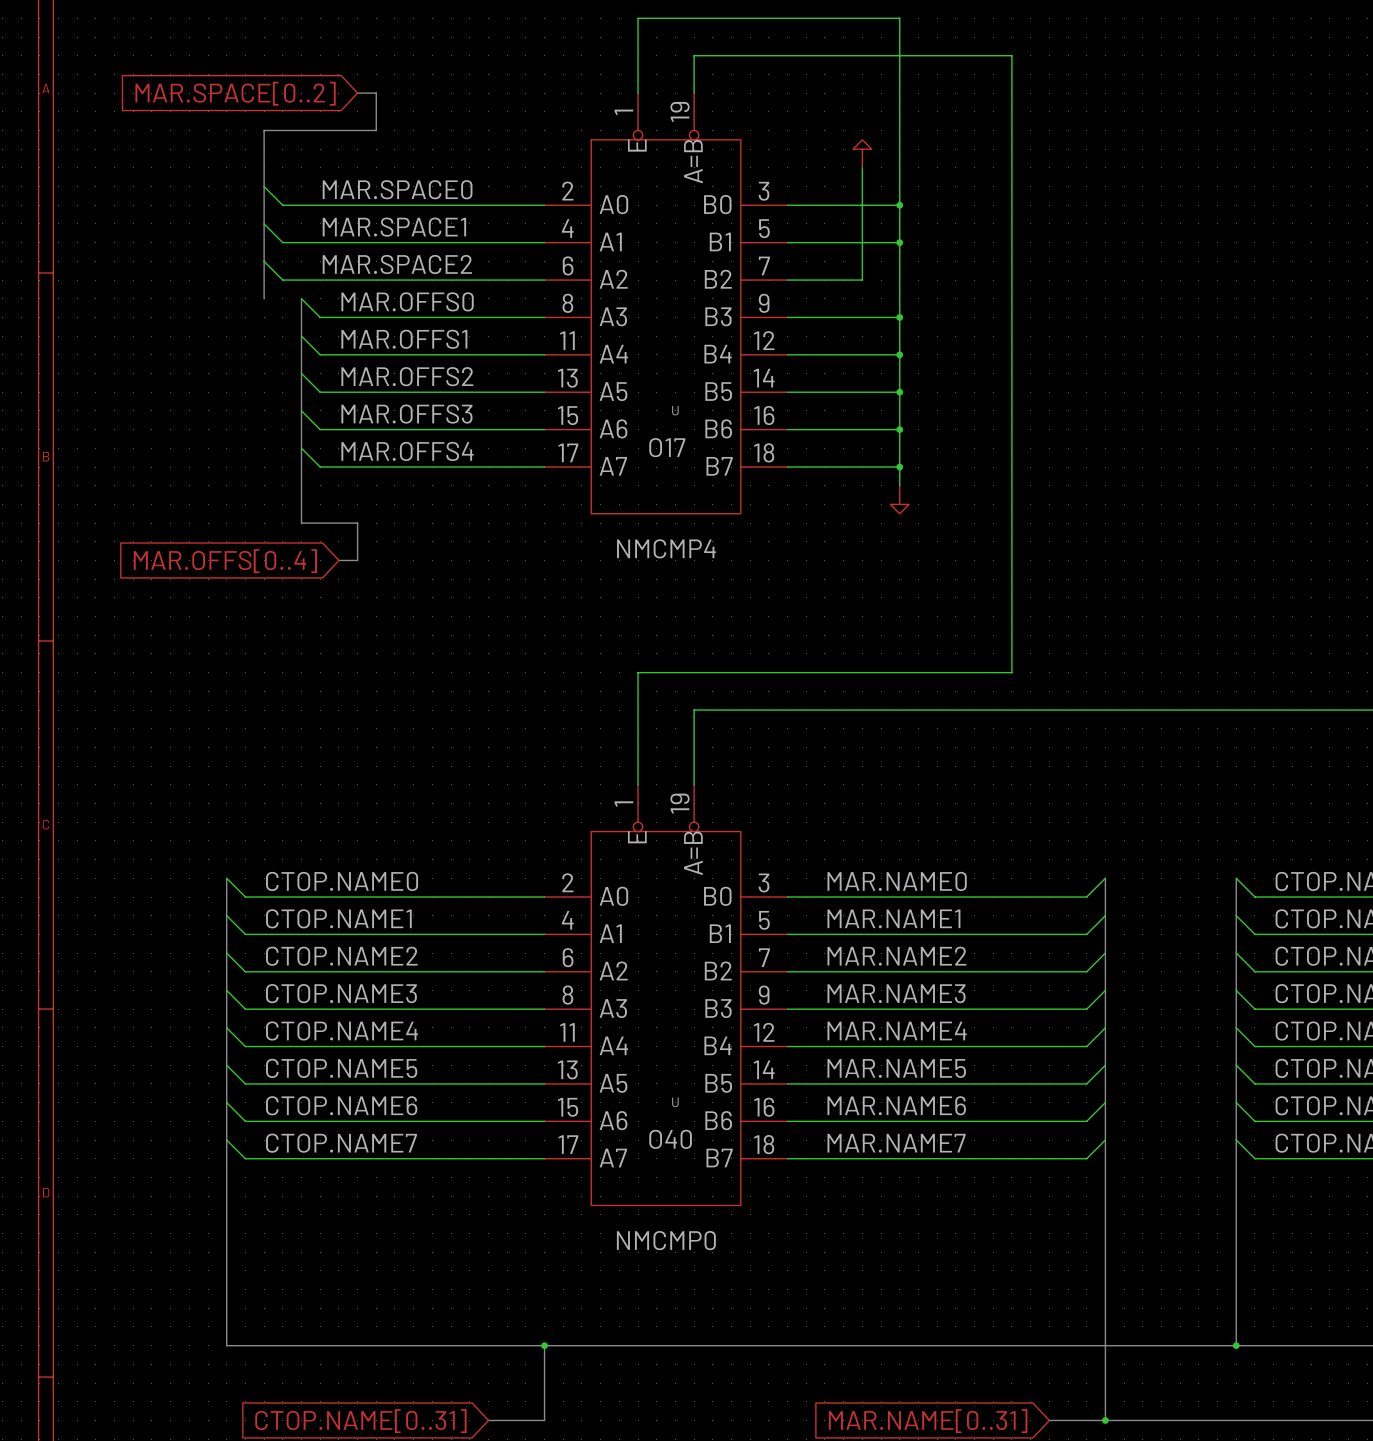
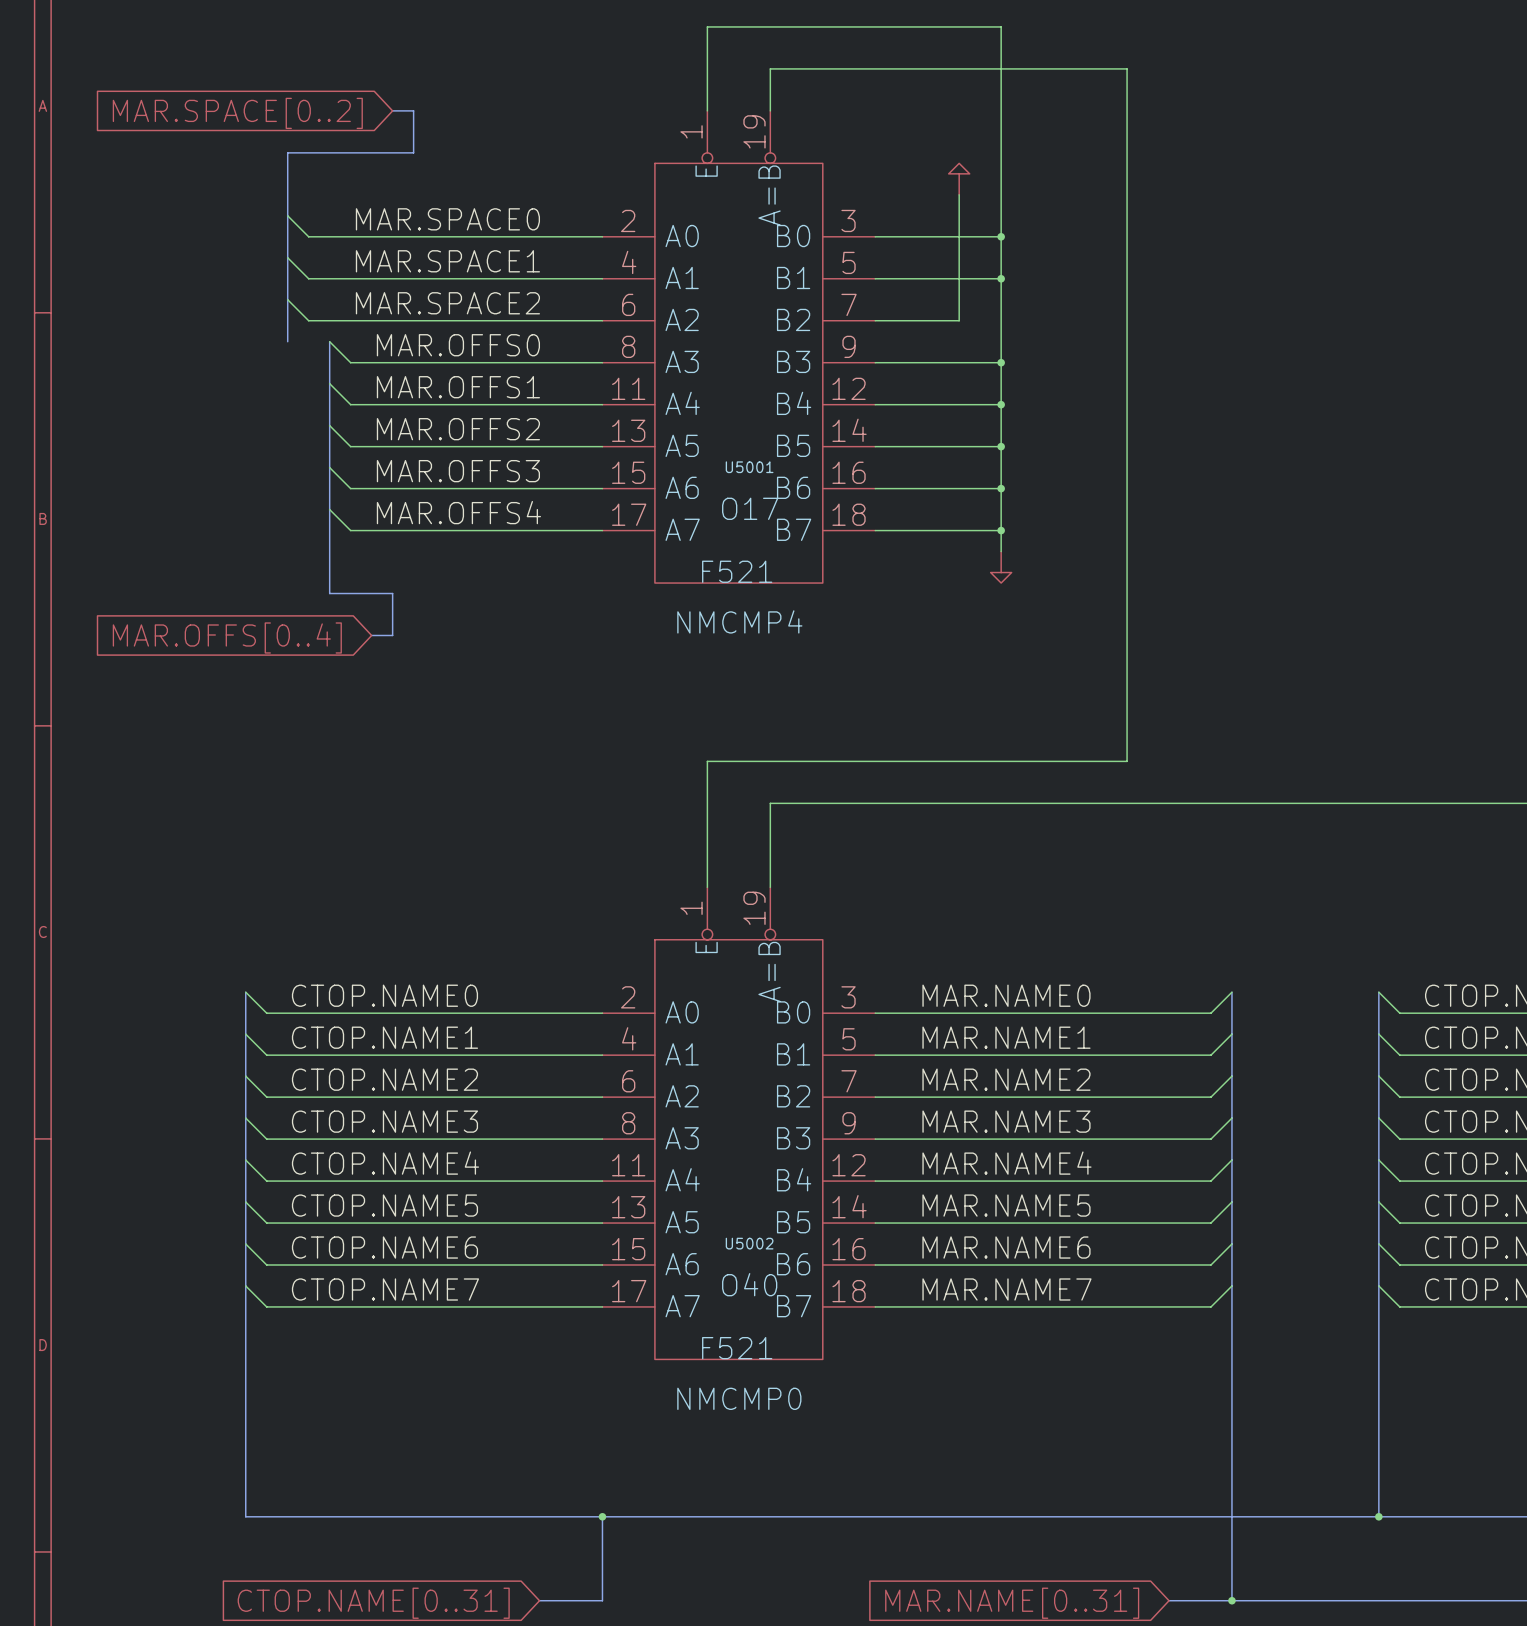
U name: U (675, 410) -> U5001 (749, 467)
U value: none -> F521 (737, 571)
U name: U (675, 1102) -> U5002 (749, 1243)
U value: none -> F521 (737, 1348)

